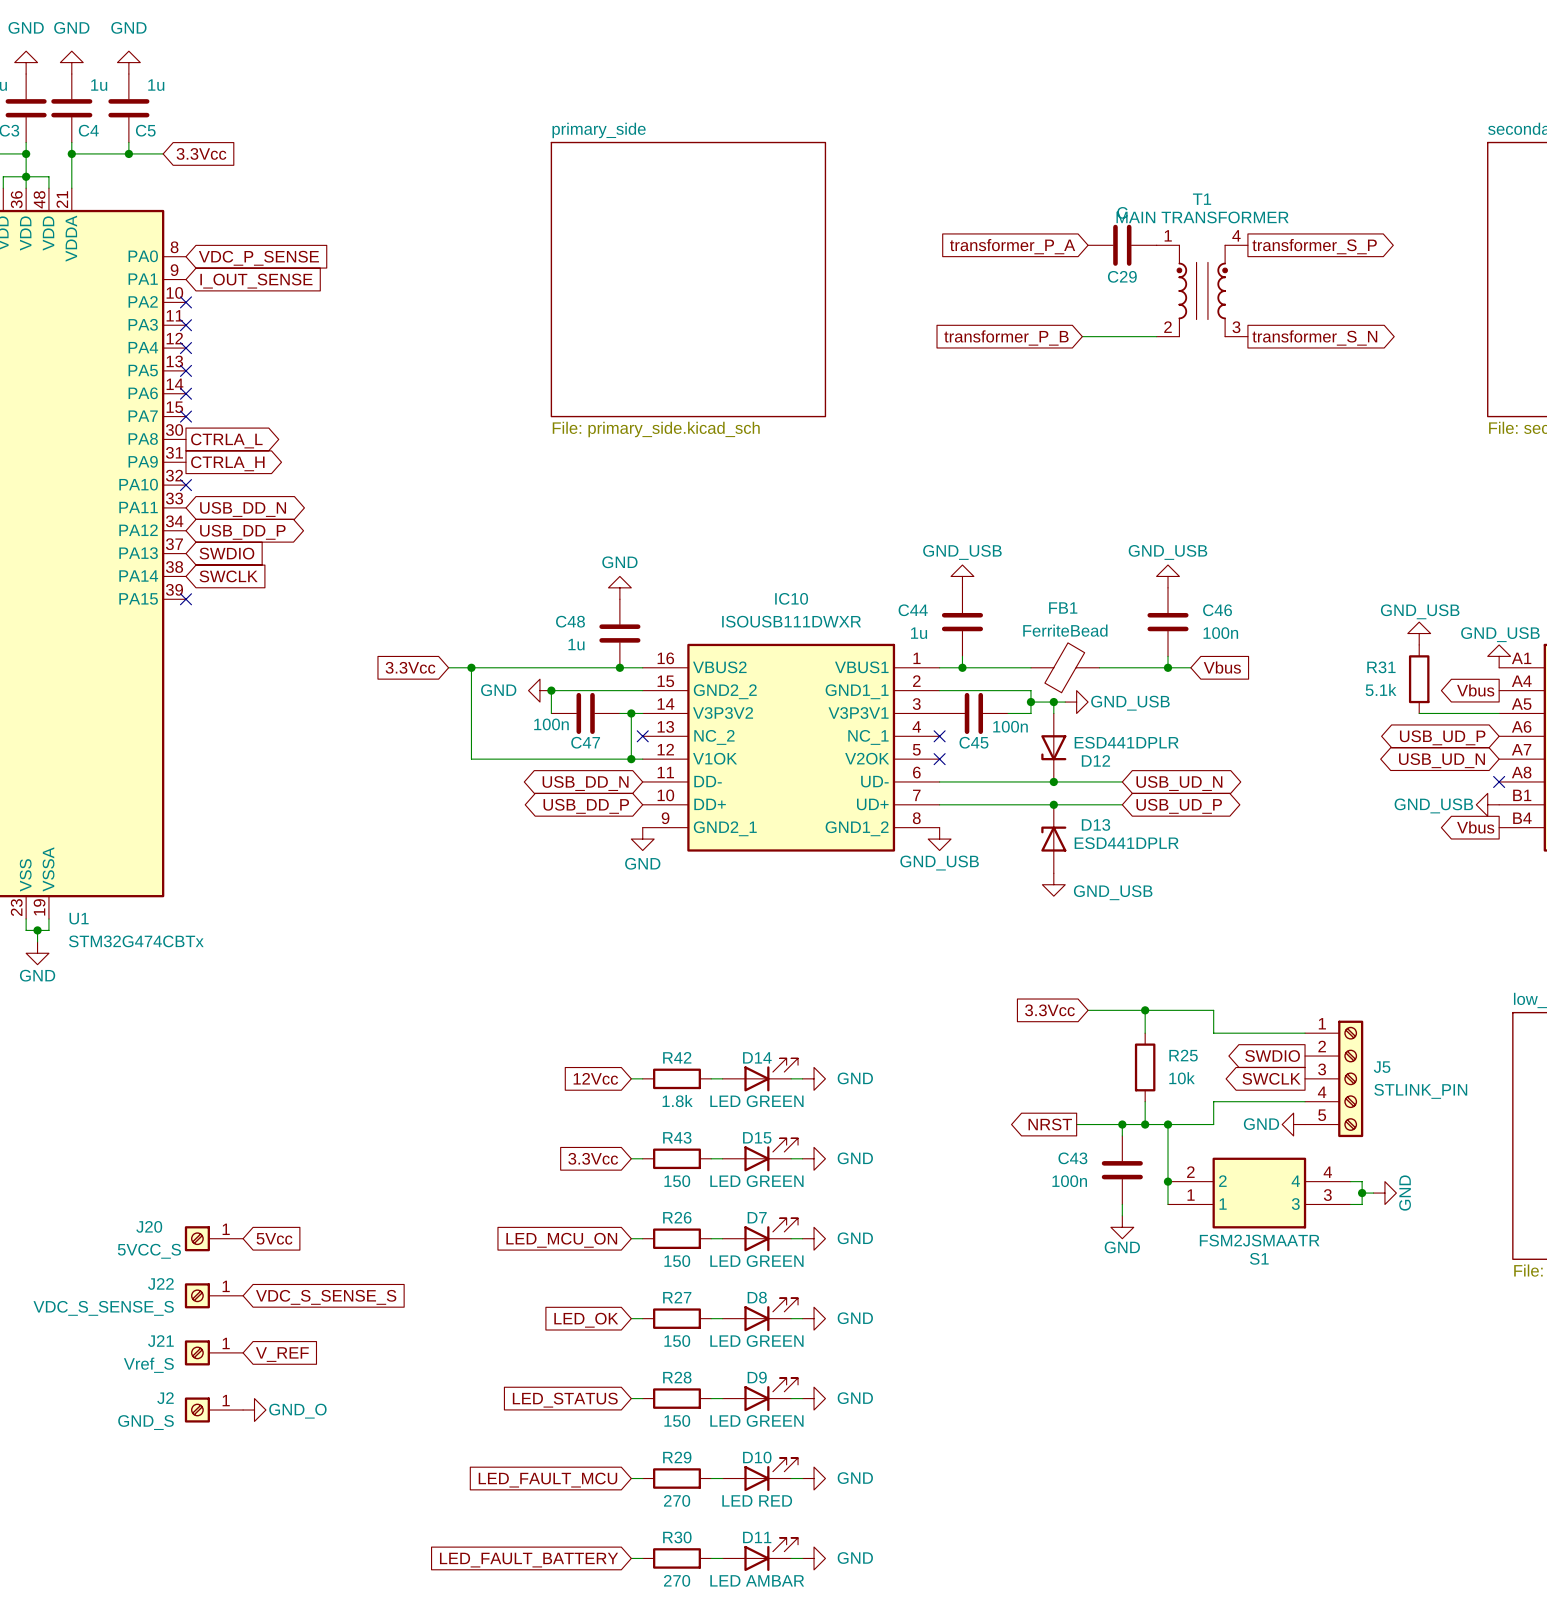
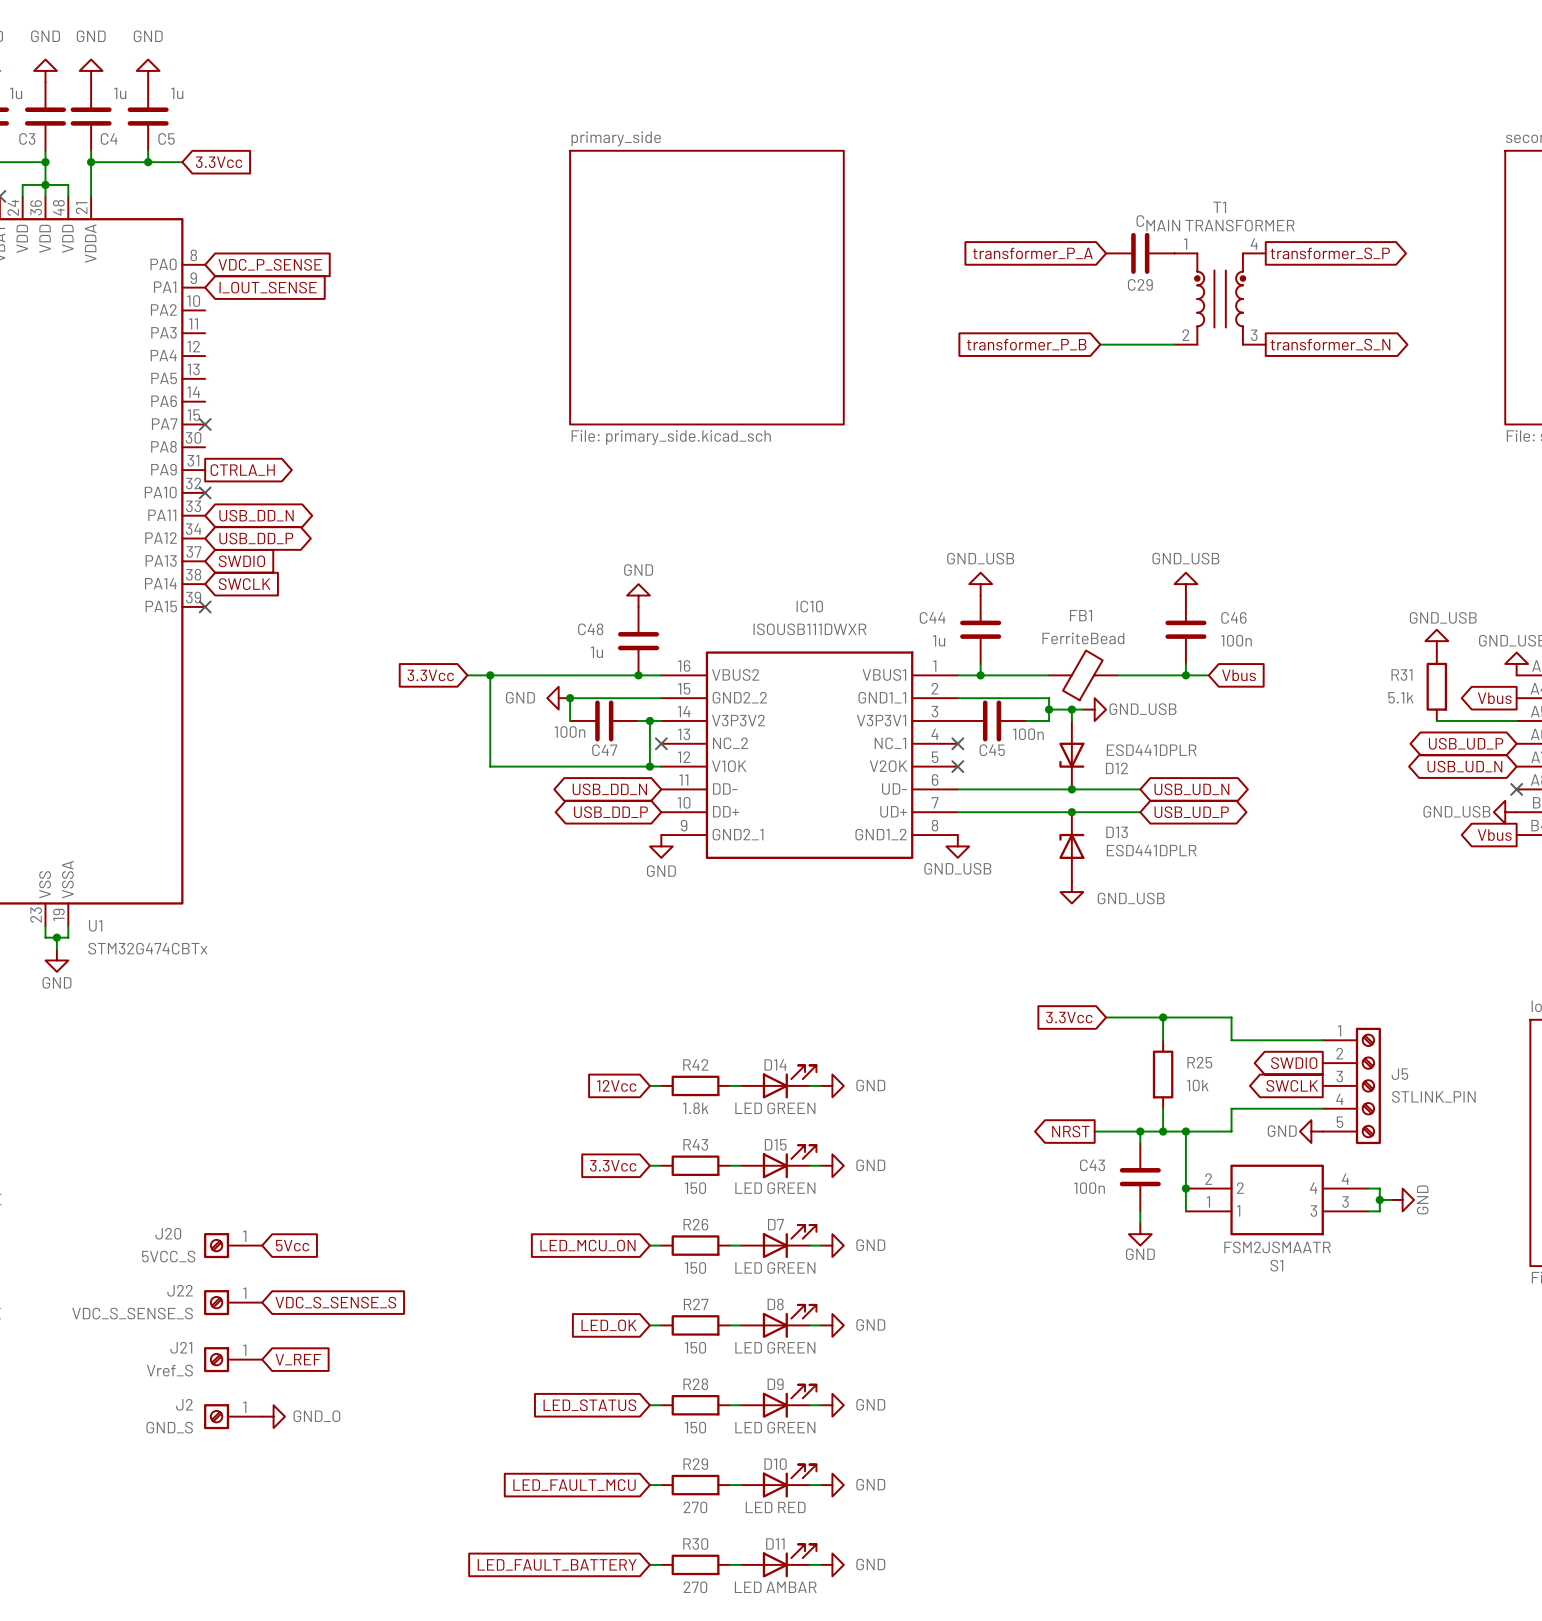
no-connect mark: (185, 302) -> none
no-connect mark: (185, 325) -> none
no-connect mark: (185, 348) -> none
no-connect mark: (185, 370) -> none
no-connect mark: (185, 393) -> none
global label: CTRLA_L (226, 440) -> none

